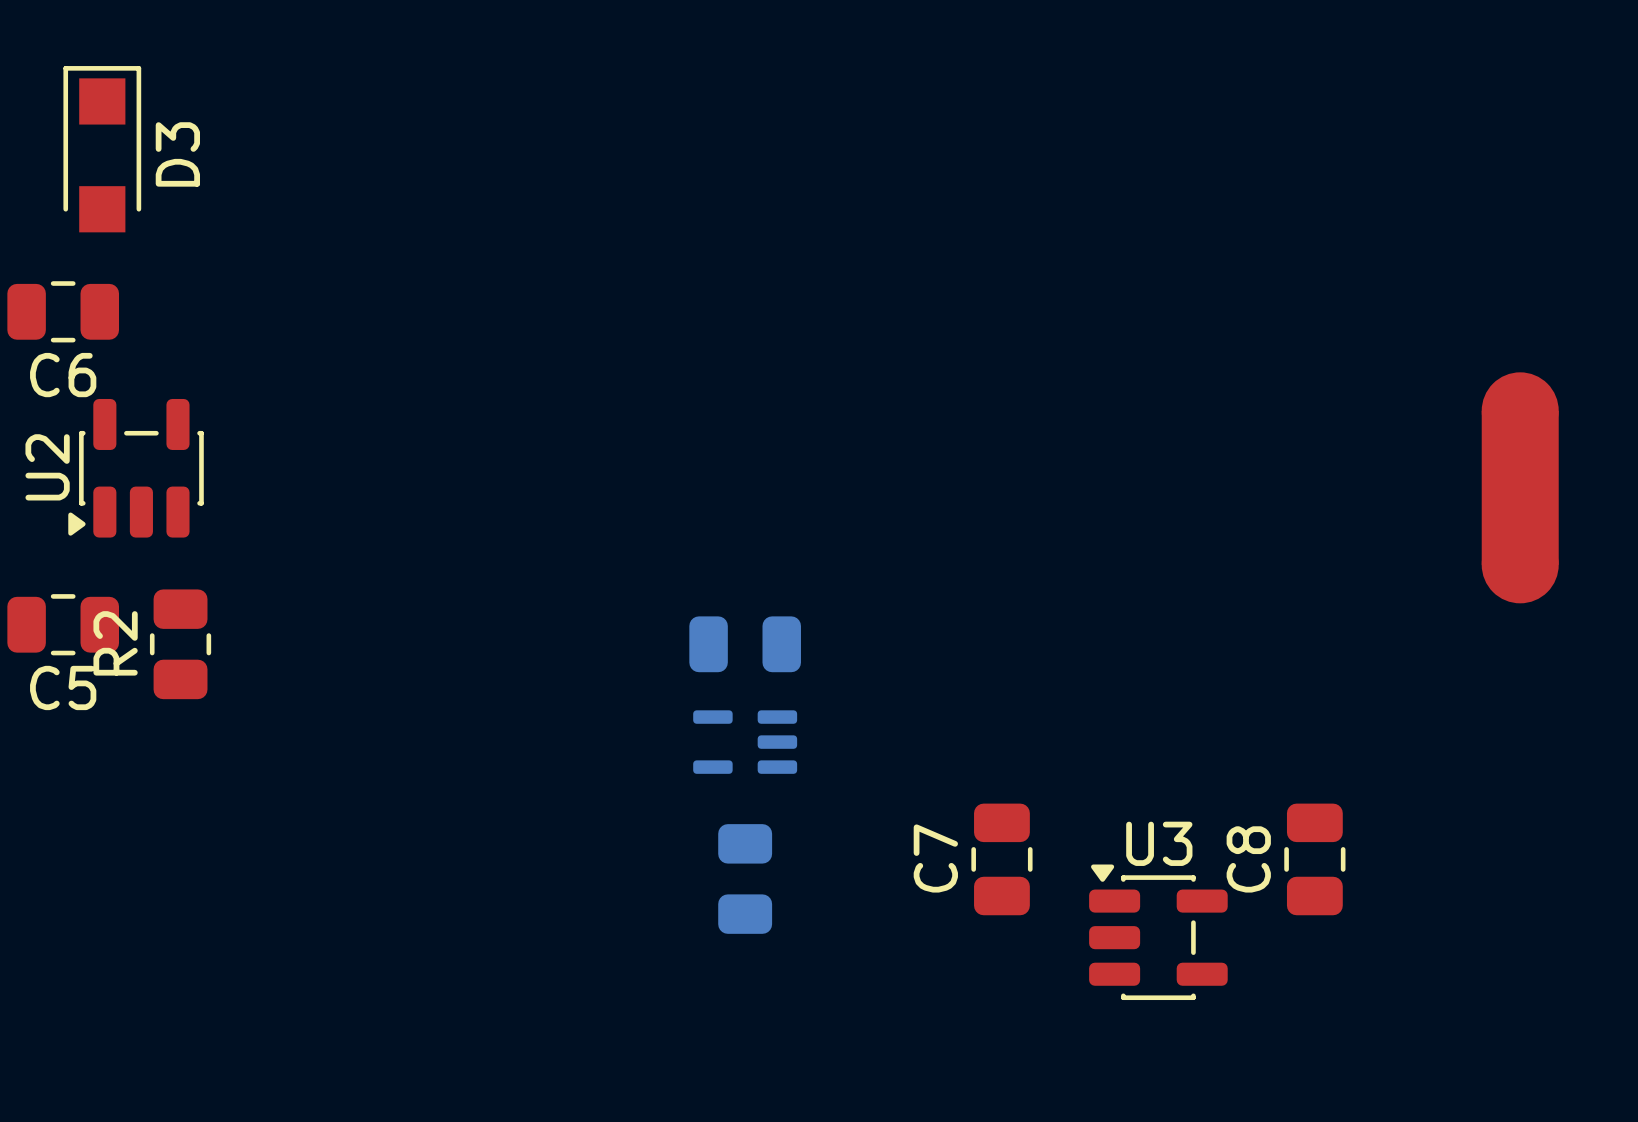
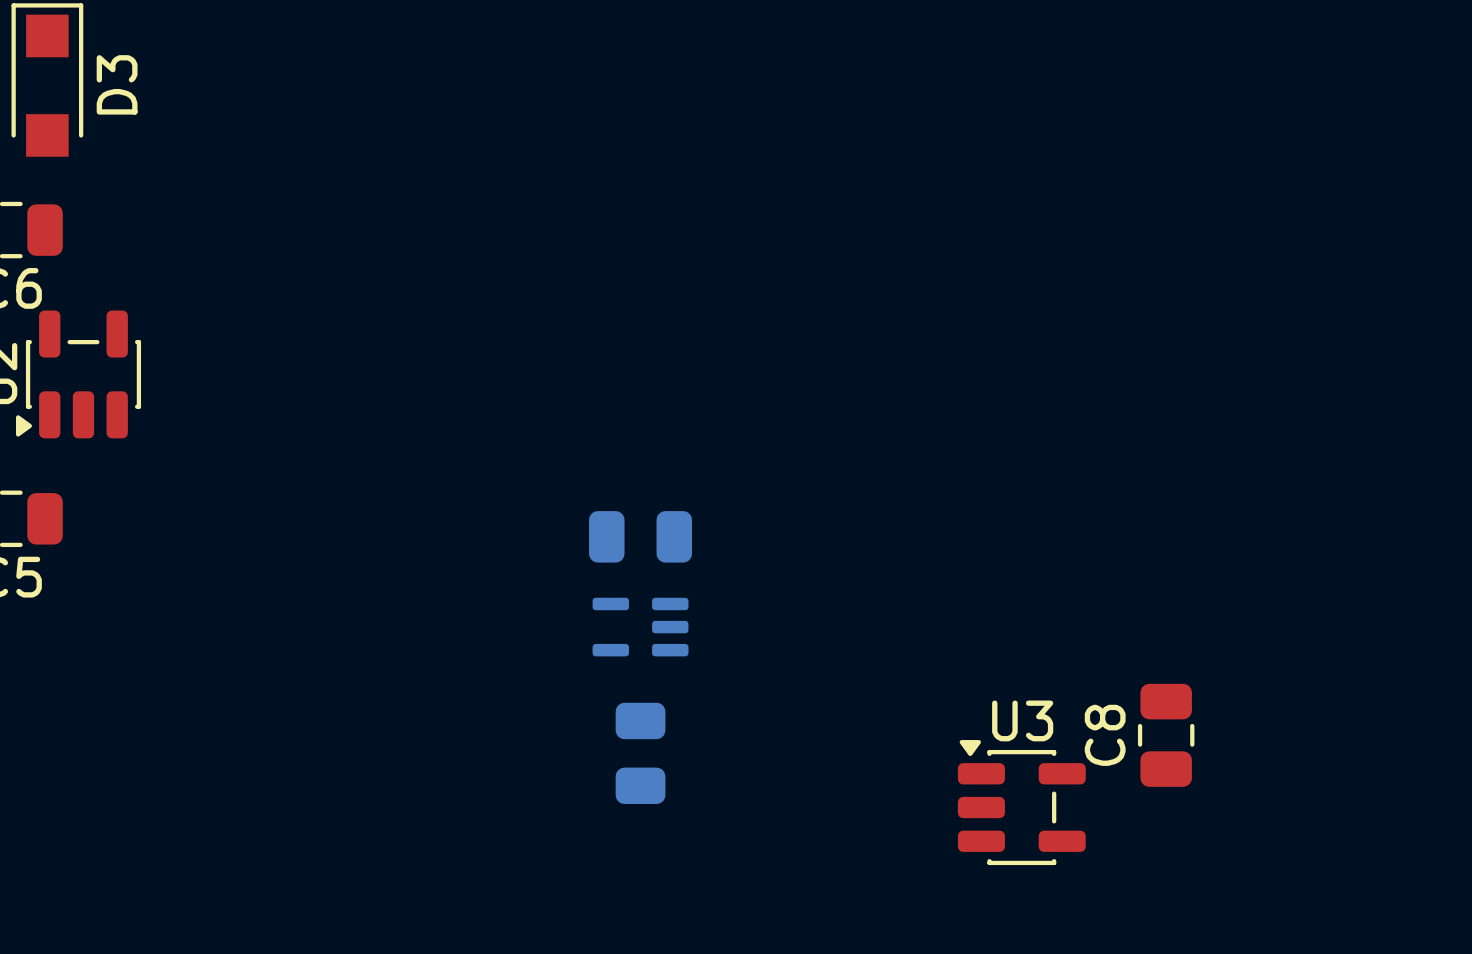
part: (1520, 487) -> none
R2: (180, 644) -> none
C7: (1001, 859) -> none

